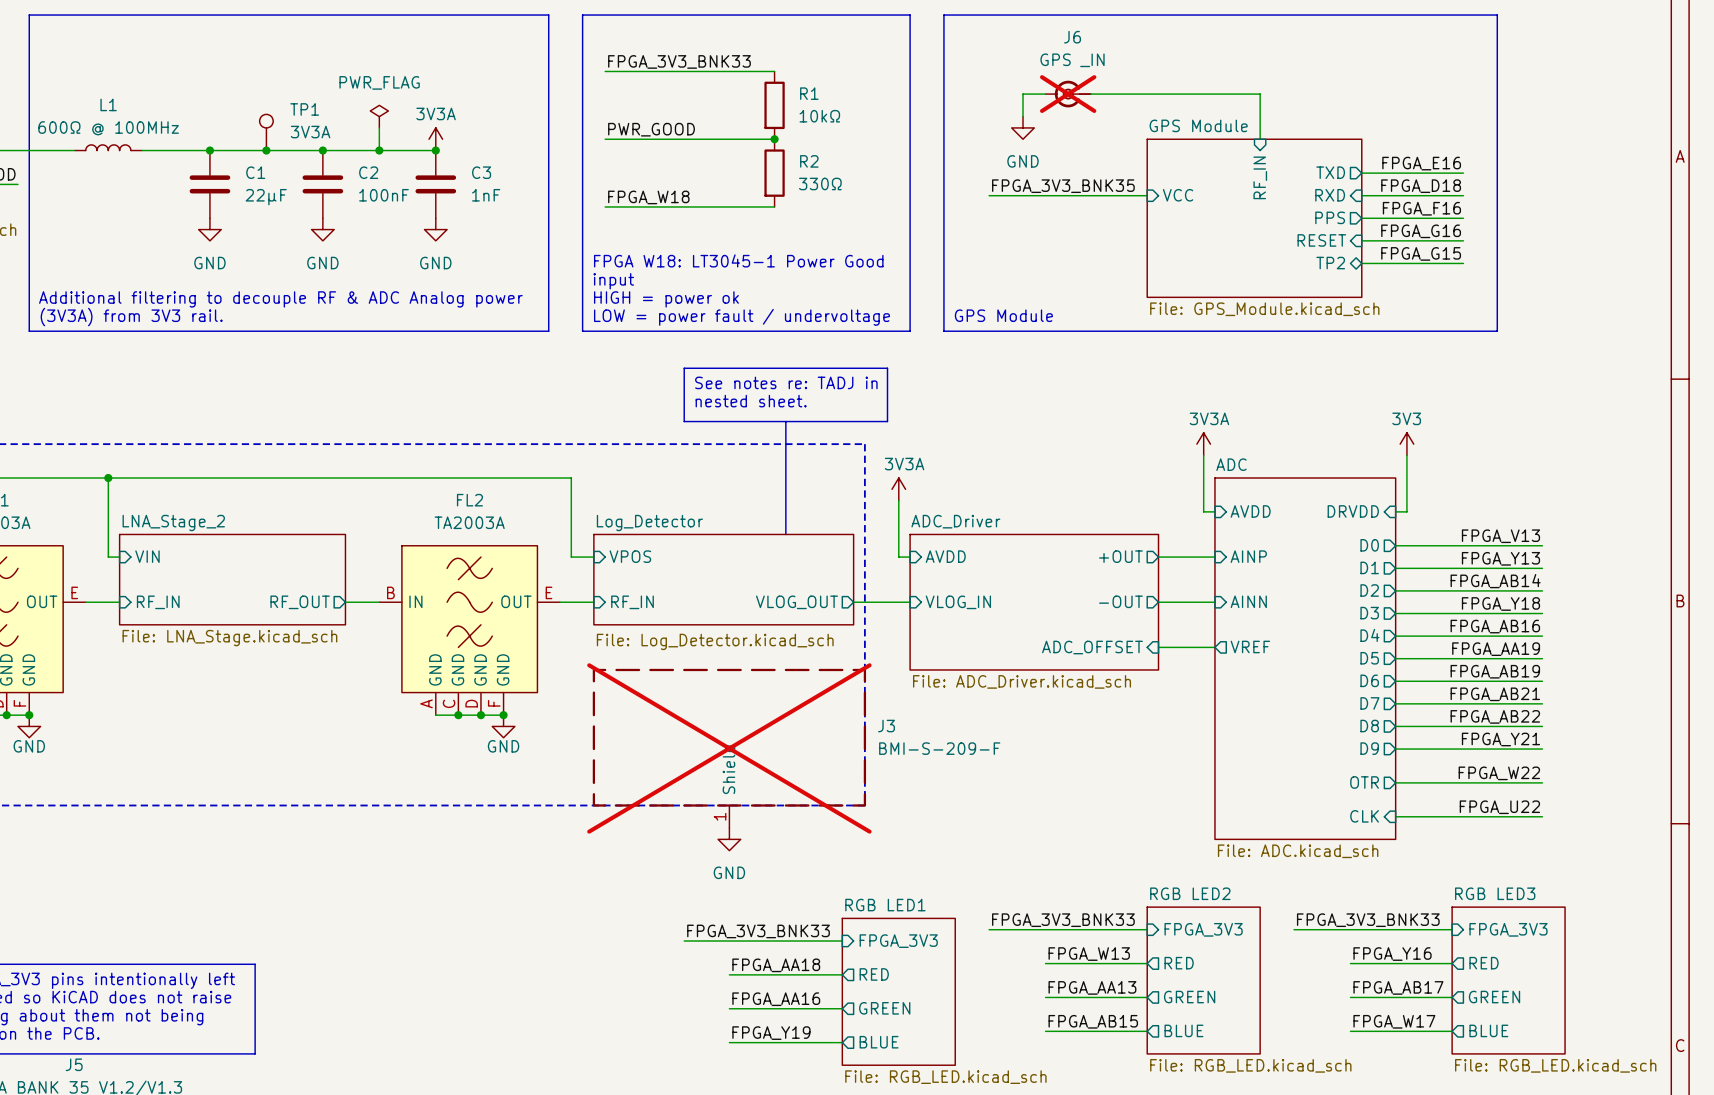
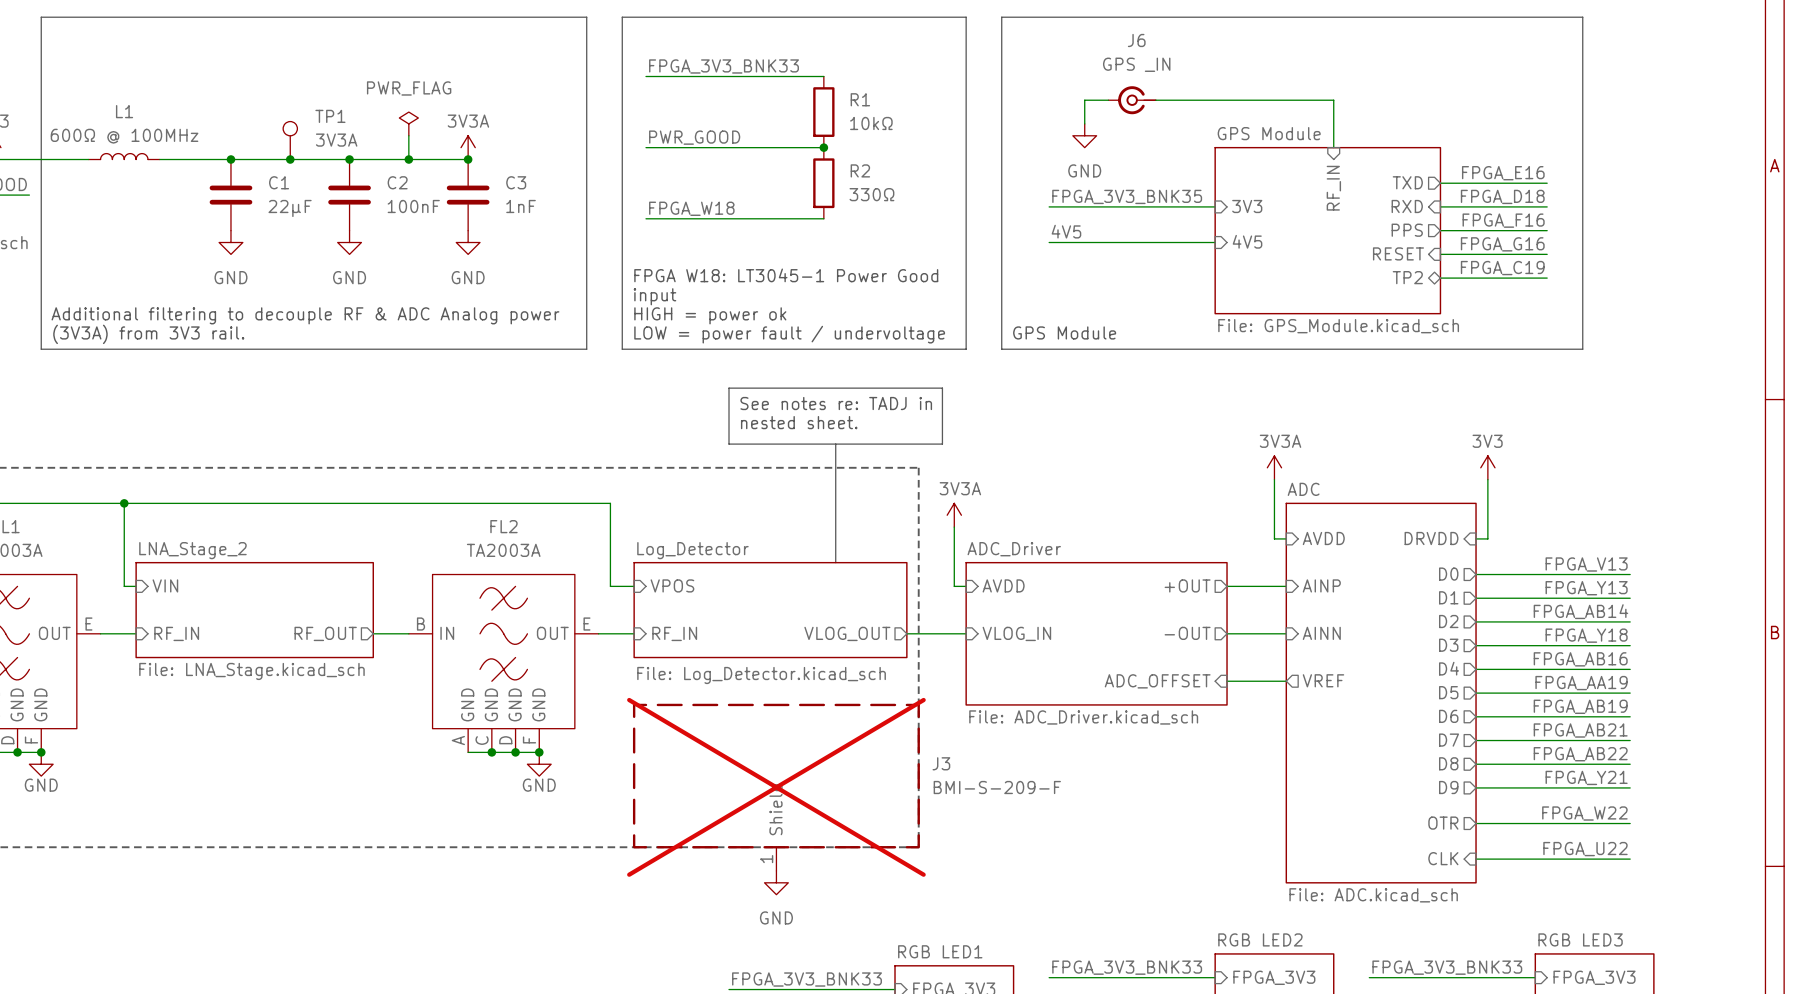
J6 do-not-place cross: (1068, 94) -> none
sheet pin: VCC (1178, 195) -> 3V3 (1247, 206)
label: none -> 4V5 (1066, 231)
sheet pin: none -> 4V5 (1247, 241)
wire: none -> (1049, 242) (1215, 242)
label: FPGA_G15 (1421, 253) -> FPGA_C19 (1502, 268)

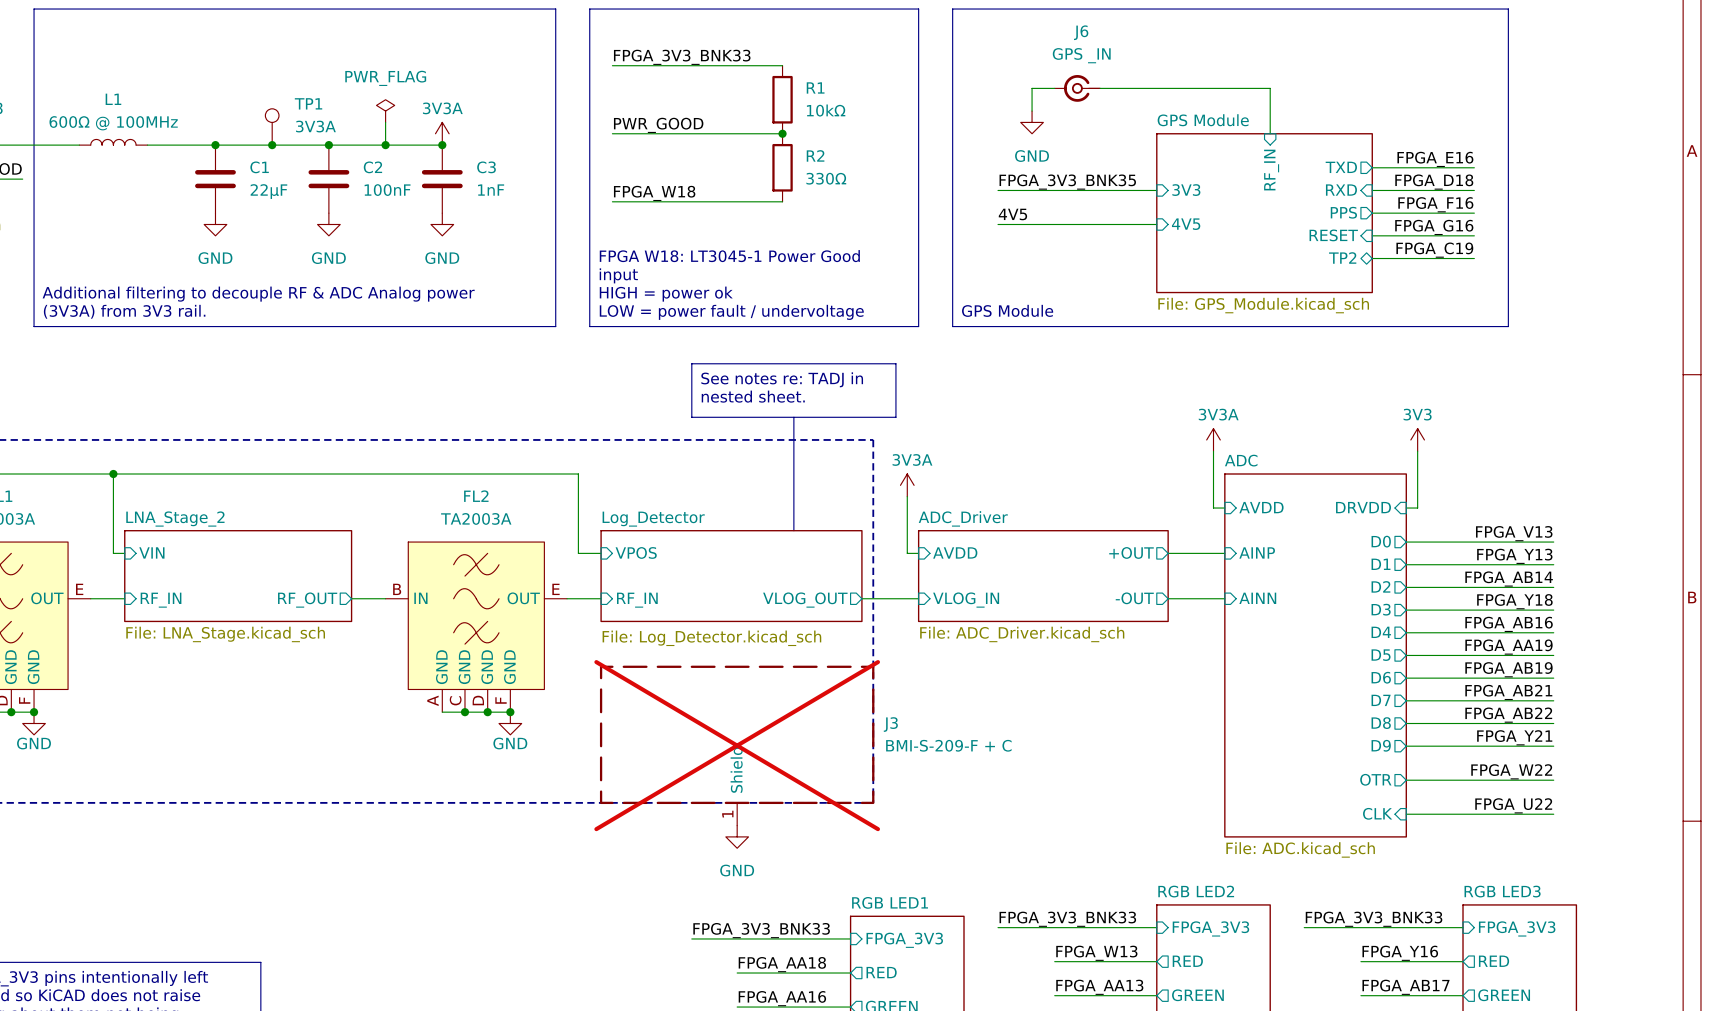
sheet ADC_Driver: none -> File: ADC_Driver.kicad_sch (1043, 576)
sheet ADC_Driver: File: ADC_Driver.kicad_sch (1096, 633) -> none
sheet pin: VREF (1323, 680) -> none
sheet pin: ADC_OFFSET (1157, 681) -> none
wire: (1227, 681) (1286, 681) -> none
J3 value: BMI-S-209-F (997, 787) -> BMI-S-209-F + C (948, 745)

